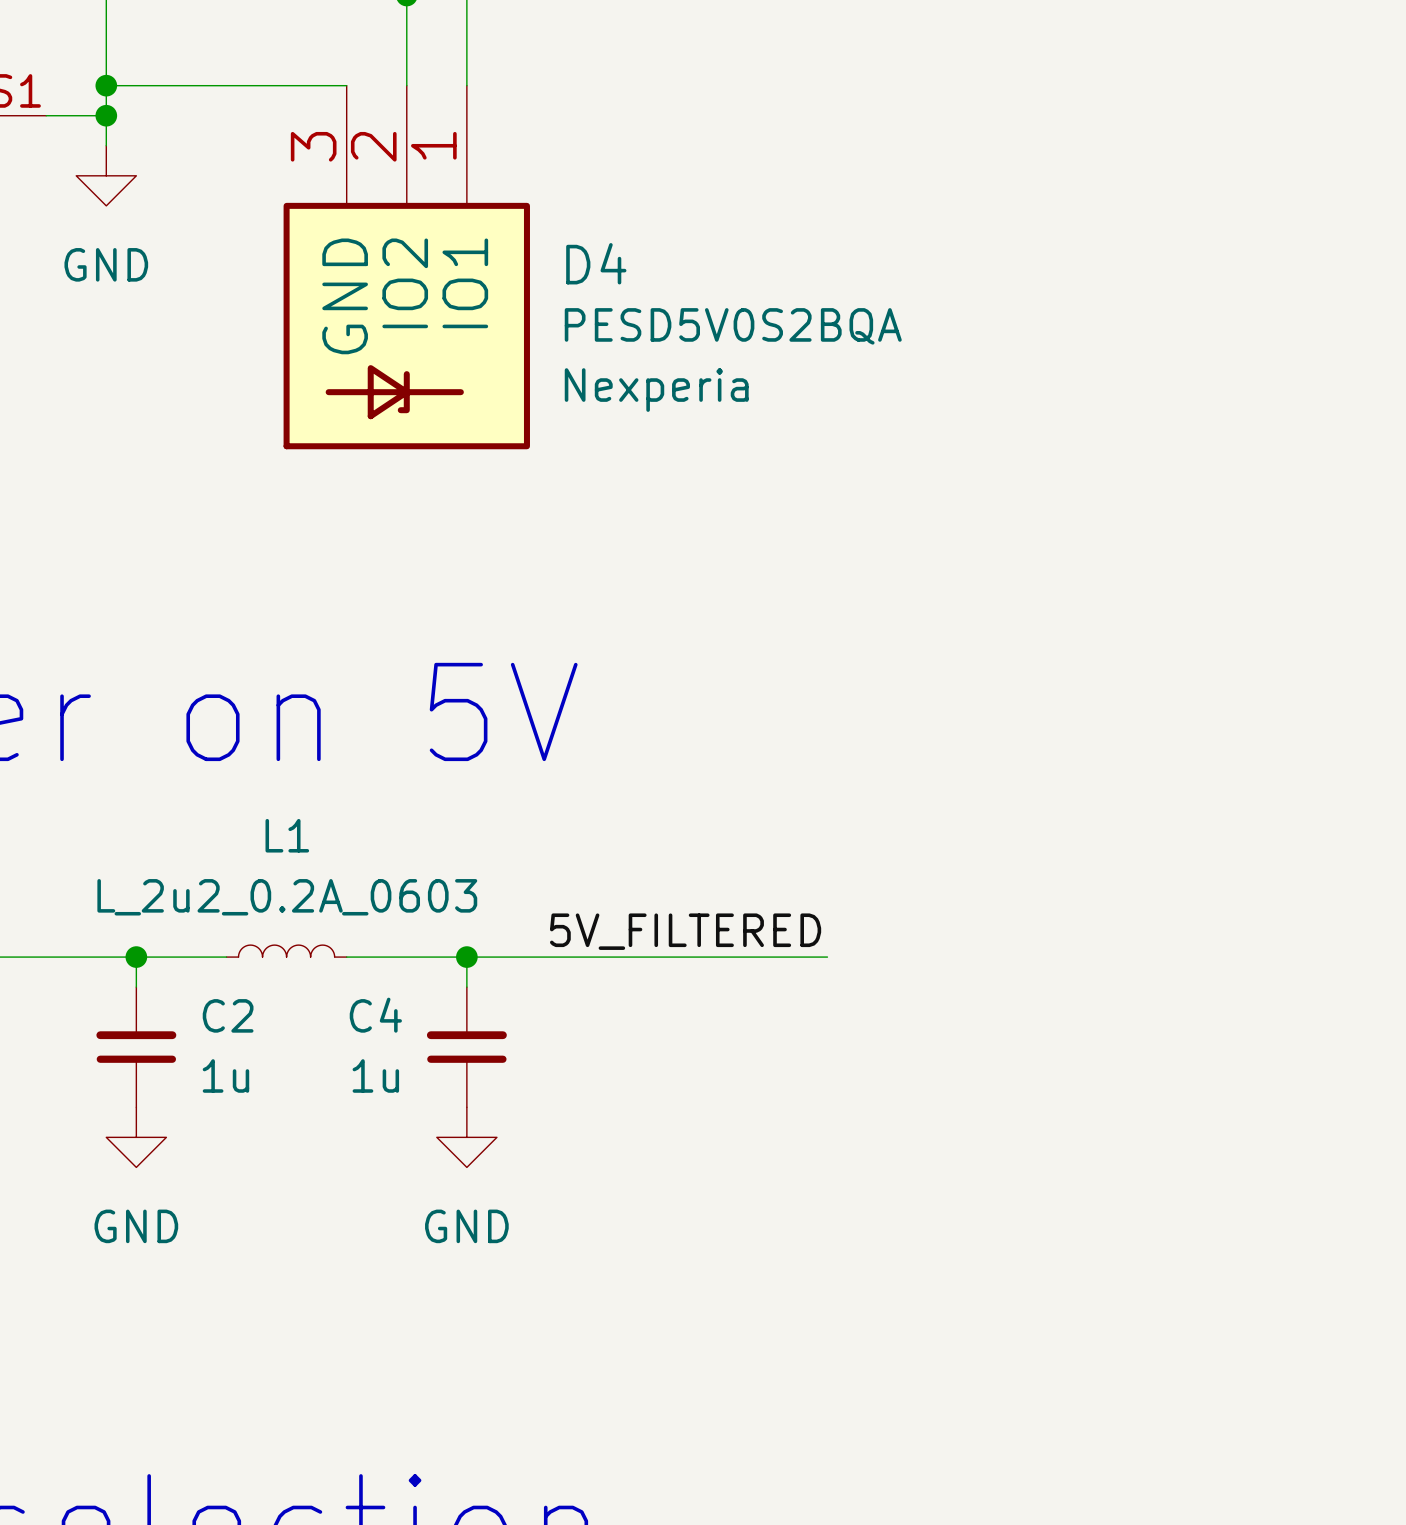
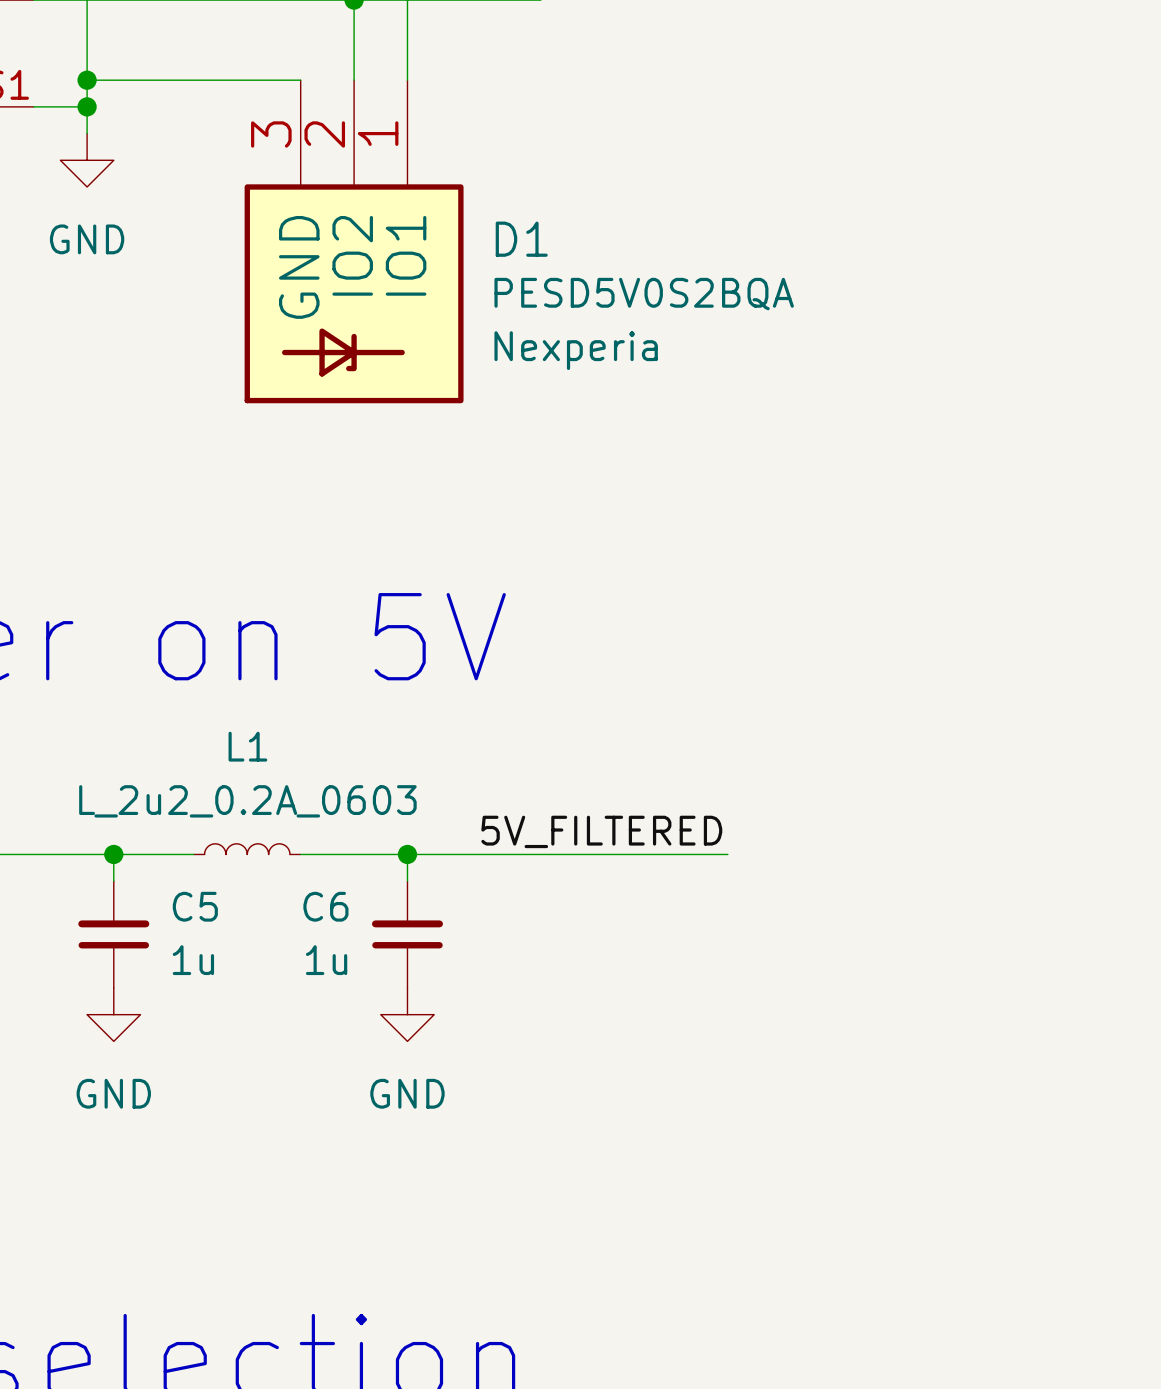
D4 name: D4 (596, 263) -> D1 (521, 239)
C2 name: C2 (228, 1015) -> C5 (195, 906)
C4 name: C4 (375, 1015) -> C6 (325, 906)

